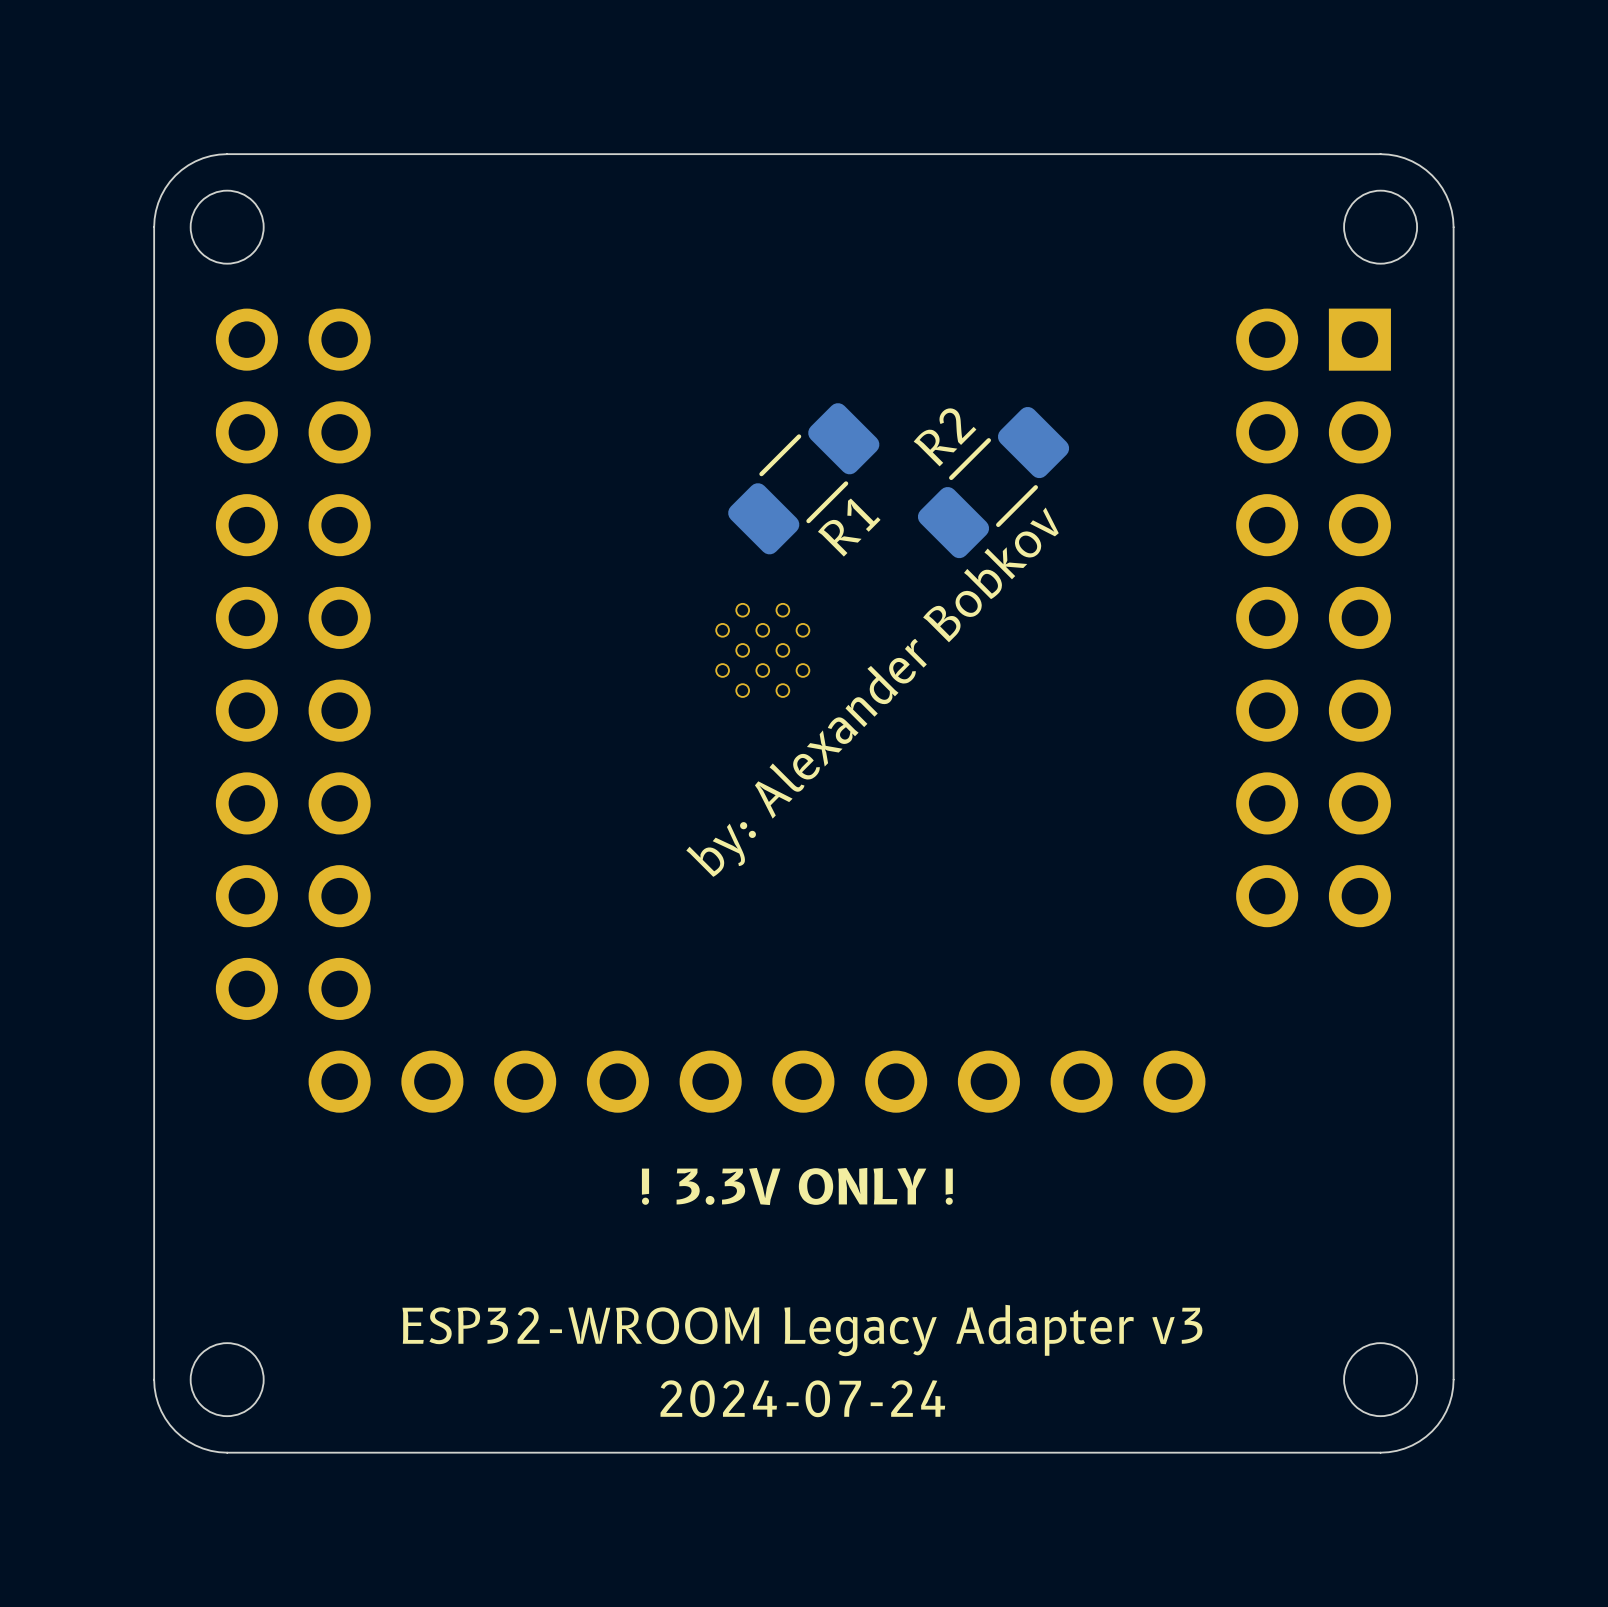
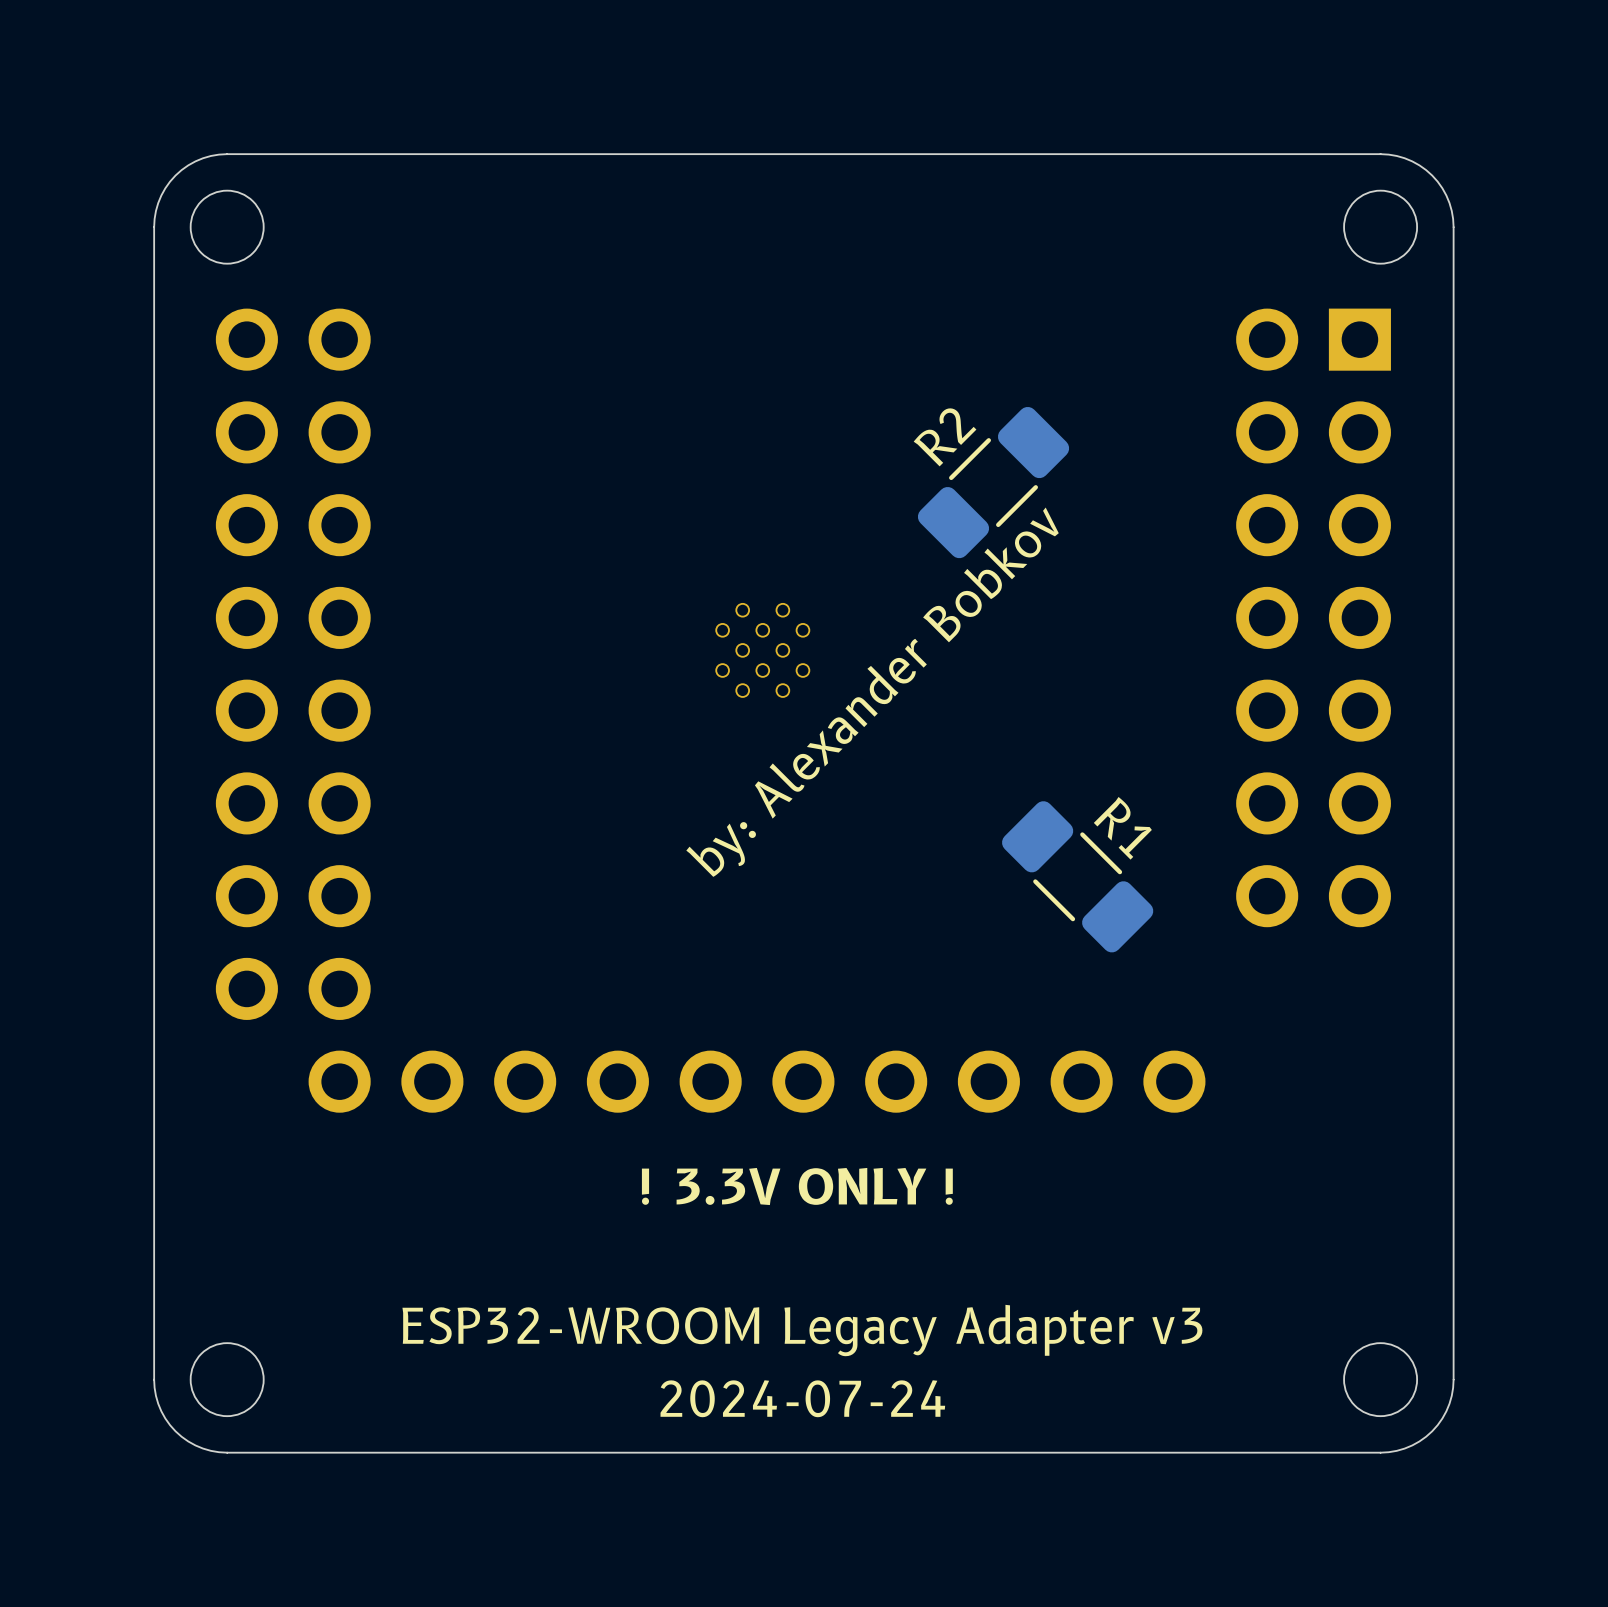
R1 rotation: 0° (803, 478) -> 90° clockwise (1077, 876)
R1 position: (803, 478) -> (1077, 876)
R1 name position: R1 (849, 527) -> R1 (1122, 828)

